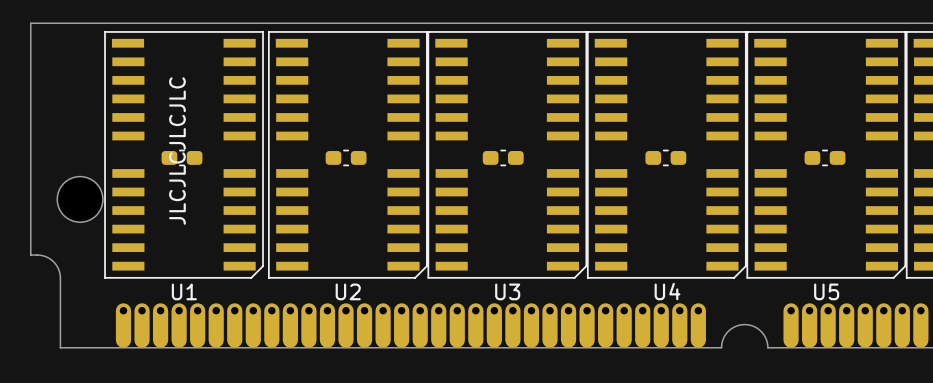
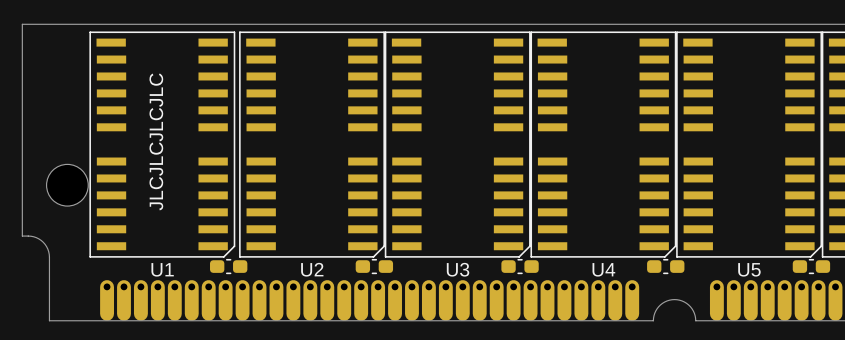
part: (182, 157) -> none
part: (346, 157) -> none
part: (503, 157) -> none
part: (665, 157) -> none
part: (825, 157) -> none
part: none -> (228, 266)
part: none -> (374, 266)
part: none -> (520, 266)
part: none -> (665, 266)
part: none -> (811, 266)

